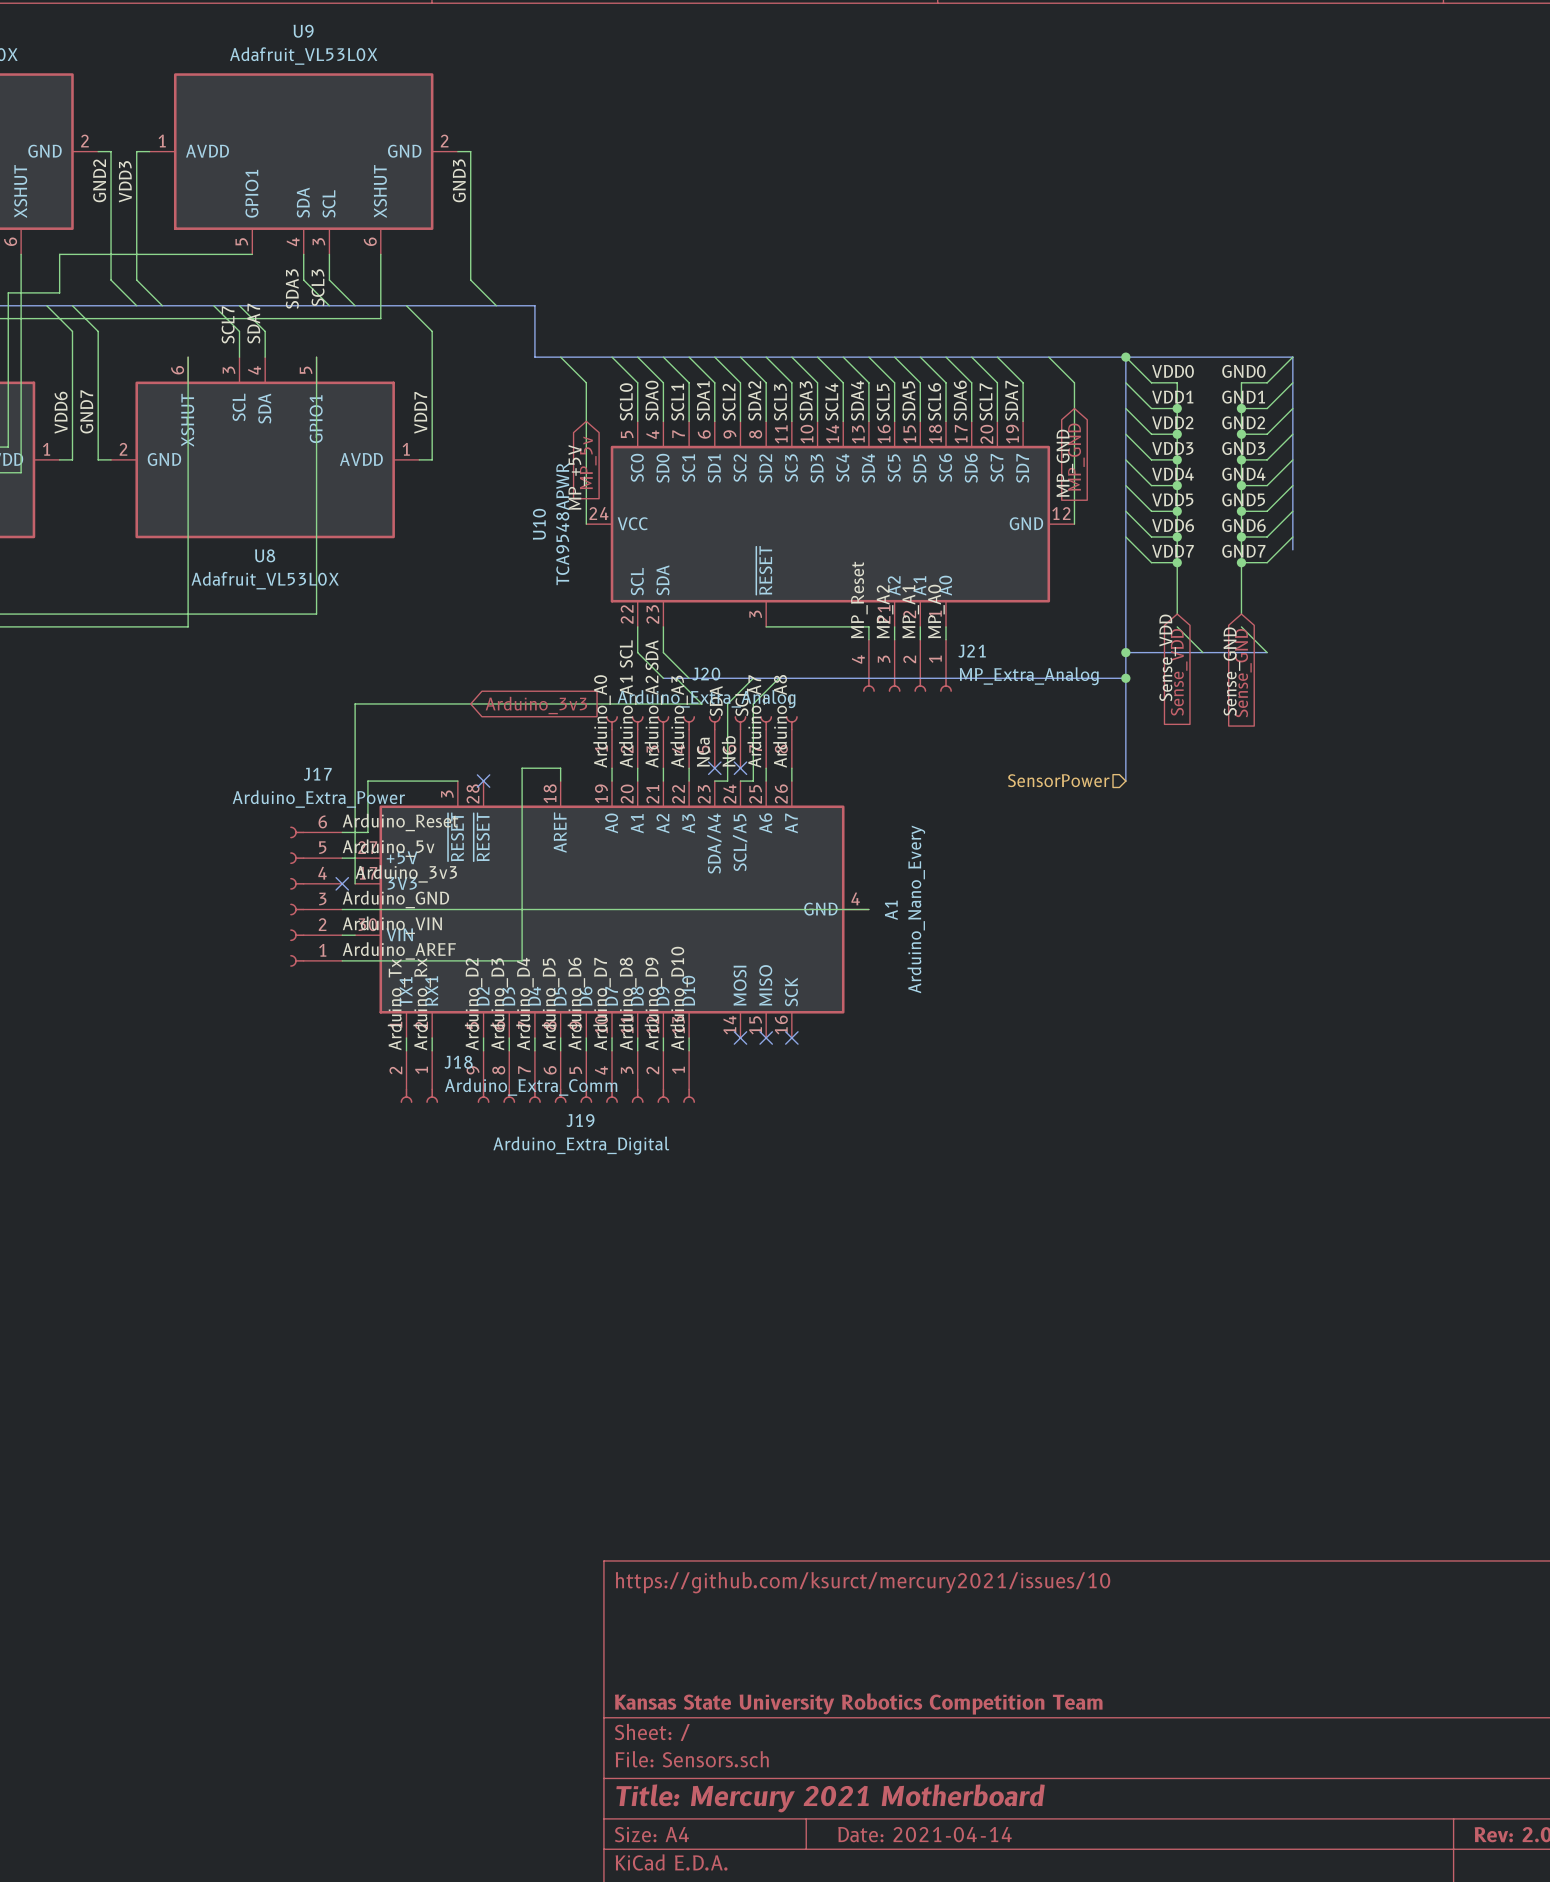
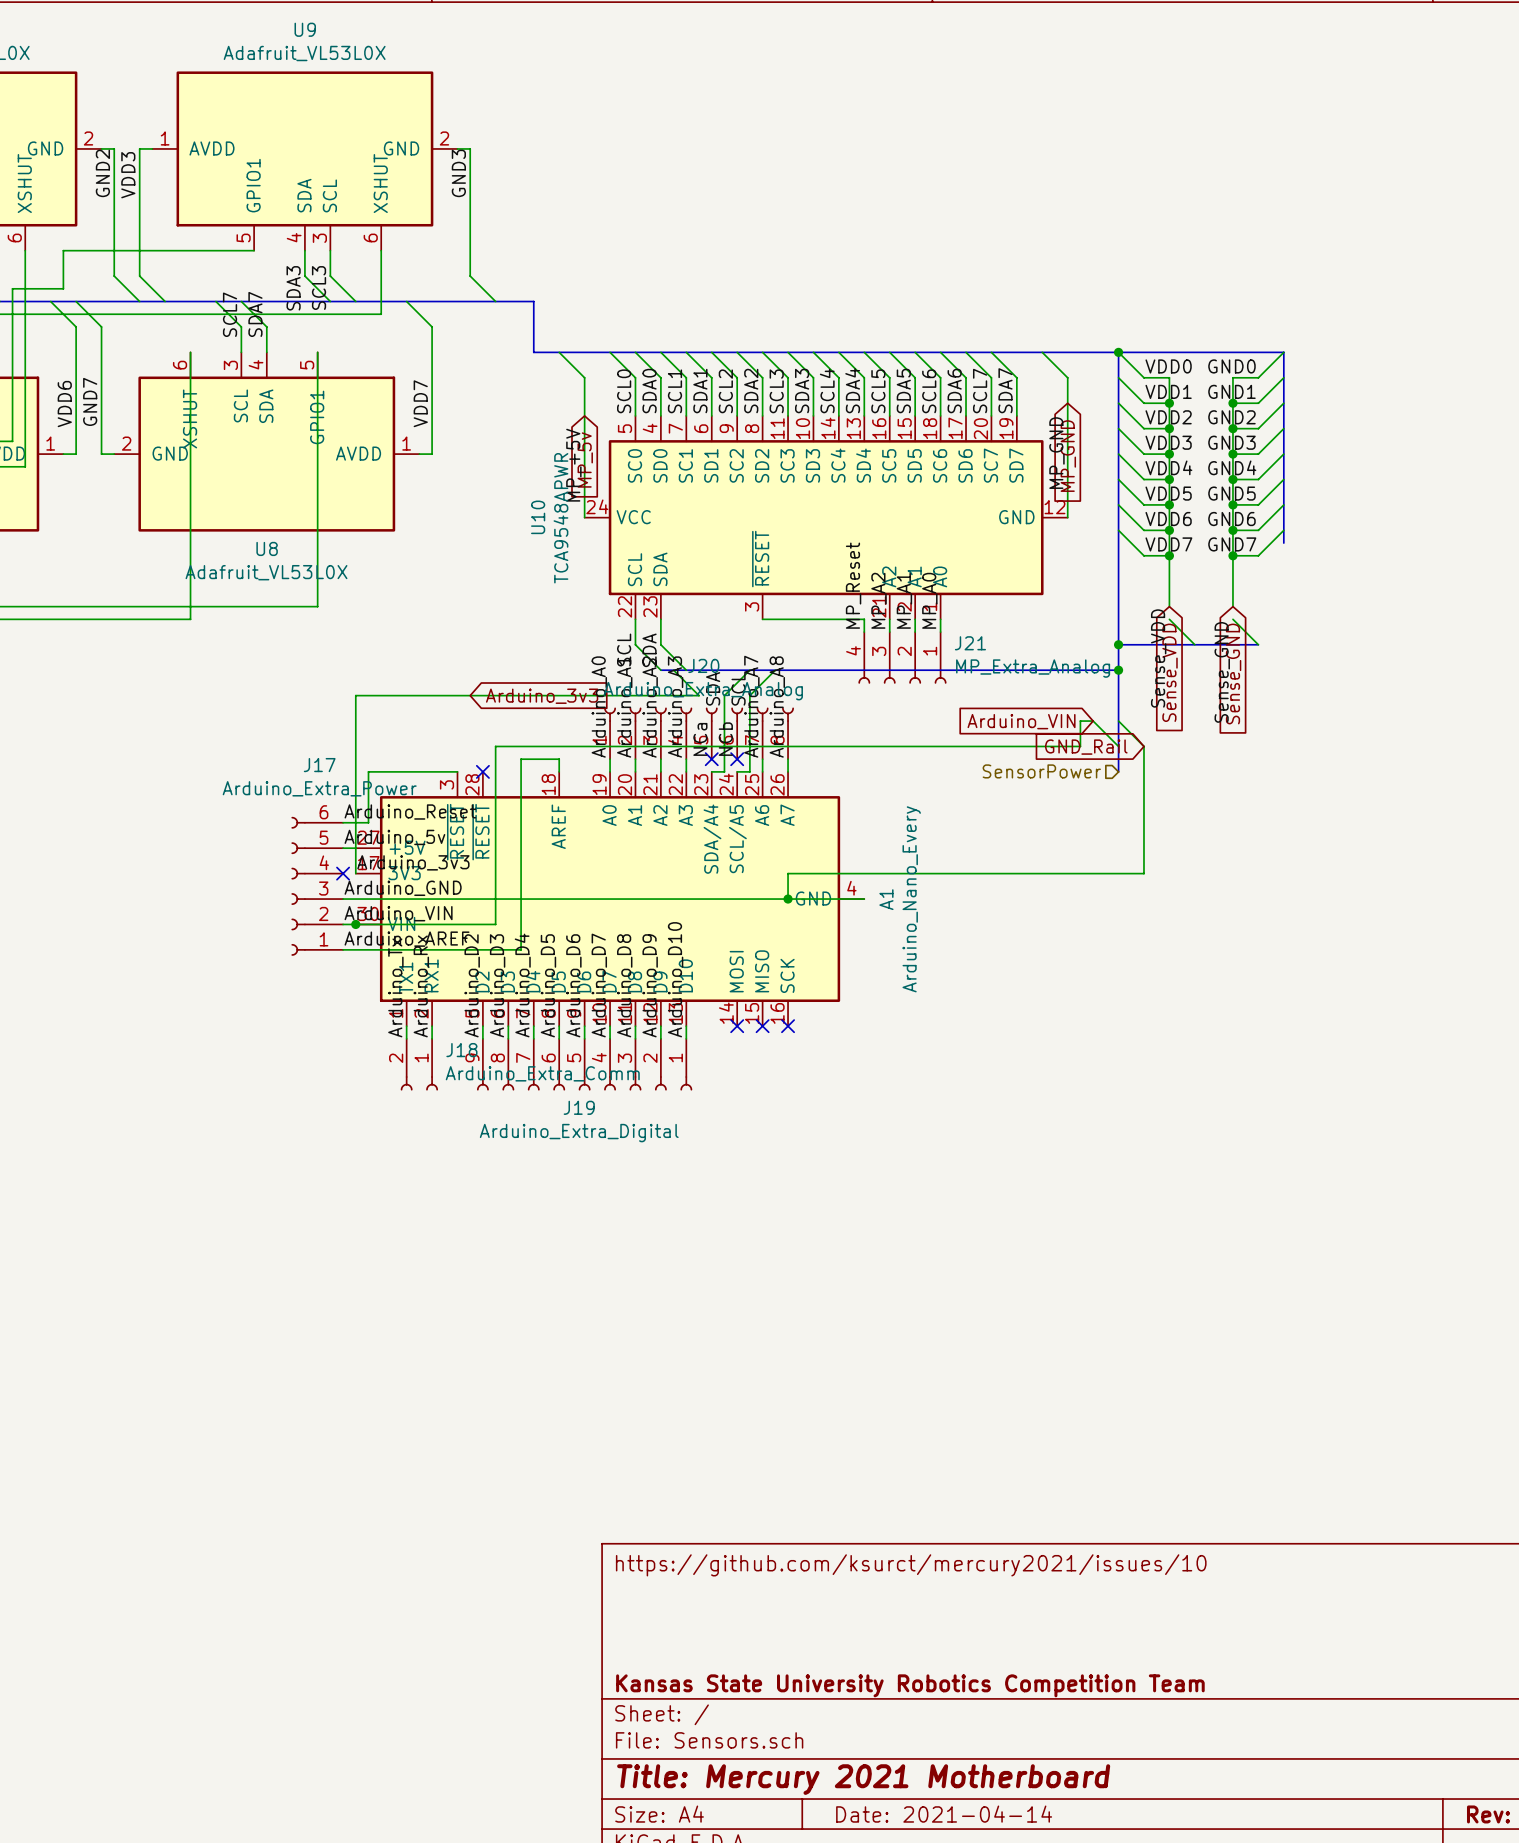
wire: none -> (1118, 721) (1143, 746) (1143, 873) (788, 873) (788, 899)
global label: none -> Arduino_VIN (1021, 721)
wire: none -> (1118, 746) (1093, 721) (1080, 721) (1080, 746) (495, 746) (495, 924) (355, 924)
global label: none -> GND_Rail (1086, 747)
junction: none -> (788, 899)
junction: none -> (355, 924)

